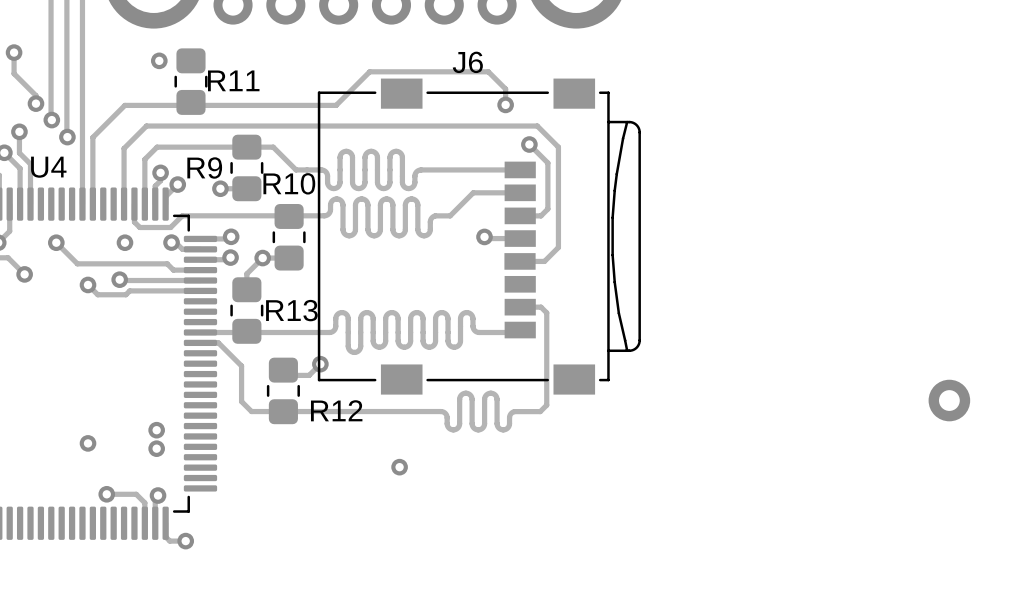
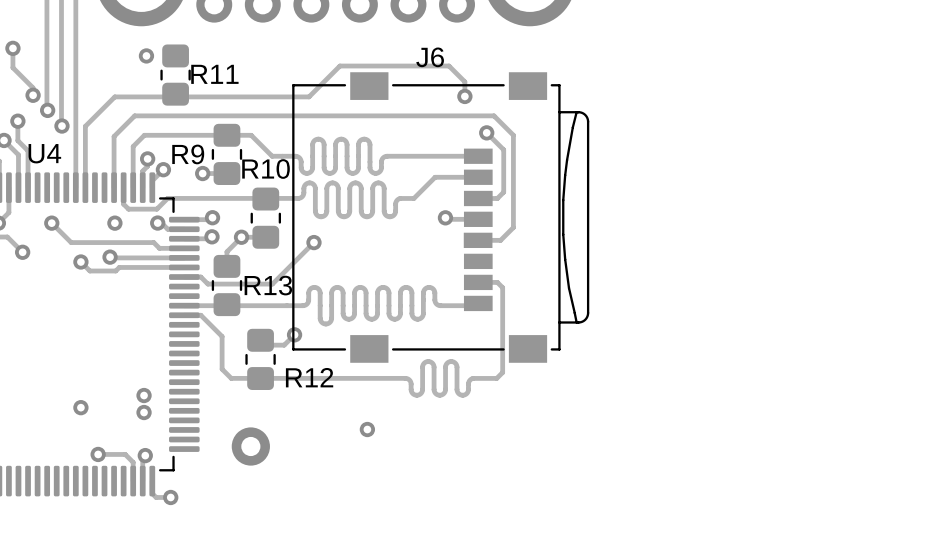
track: none -> (313, 242) (272, 284) (207, 284) (200, 277) (184, 277)
via: none -> (313, 242)
part: (949, 400) -> none
part: none -> (250, 446)

